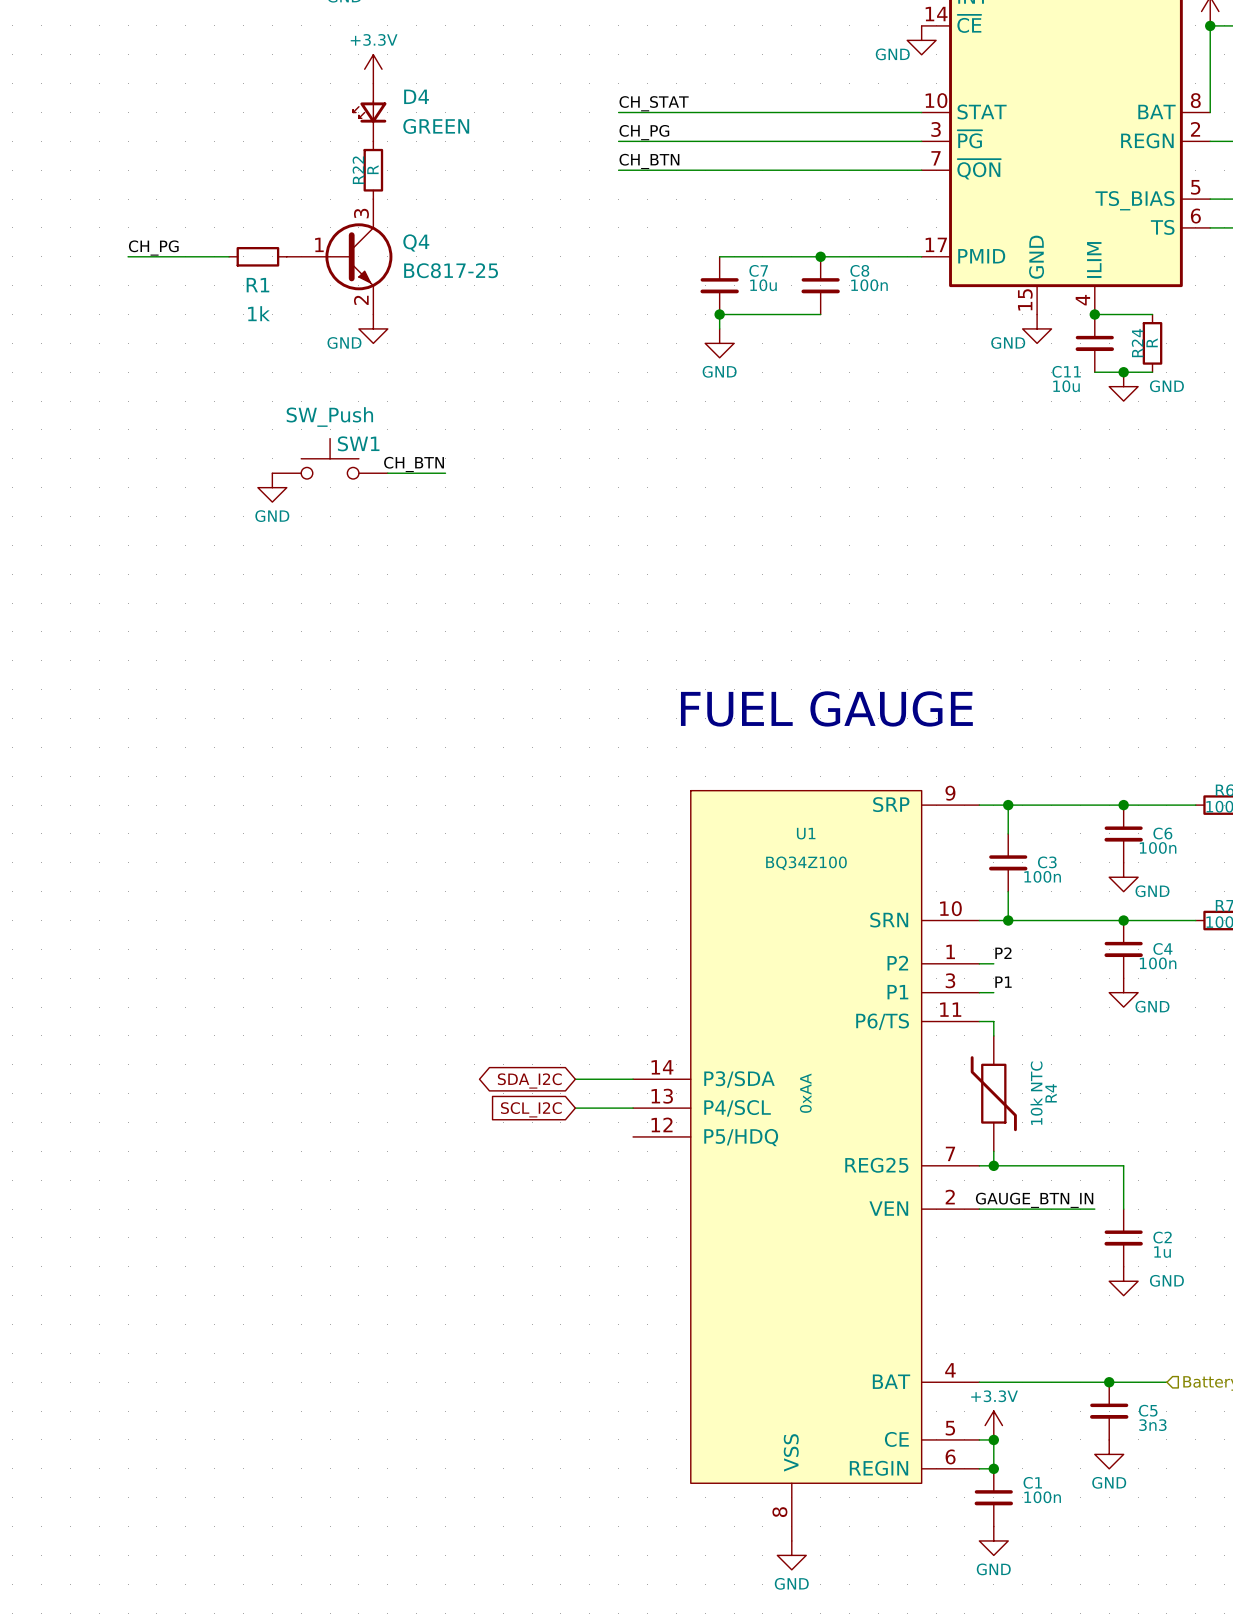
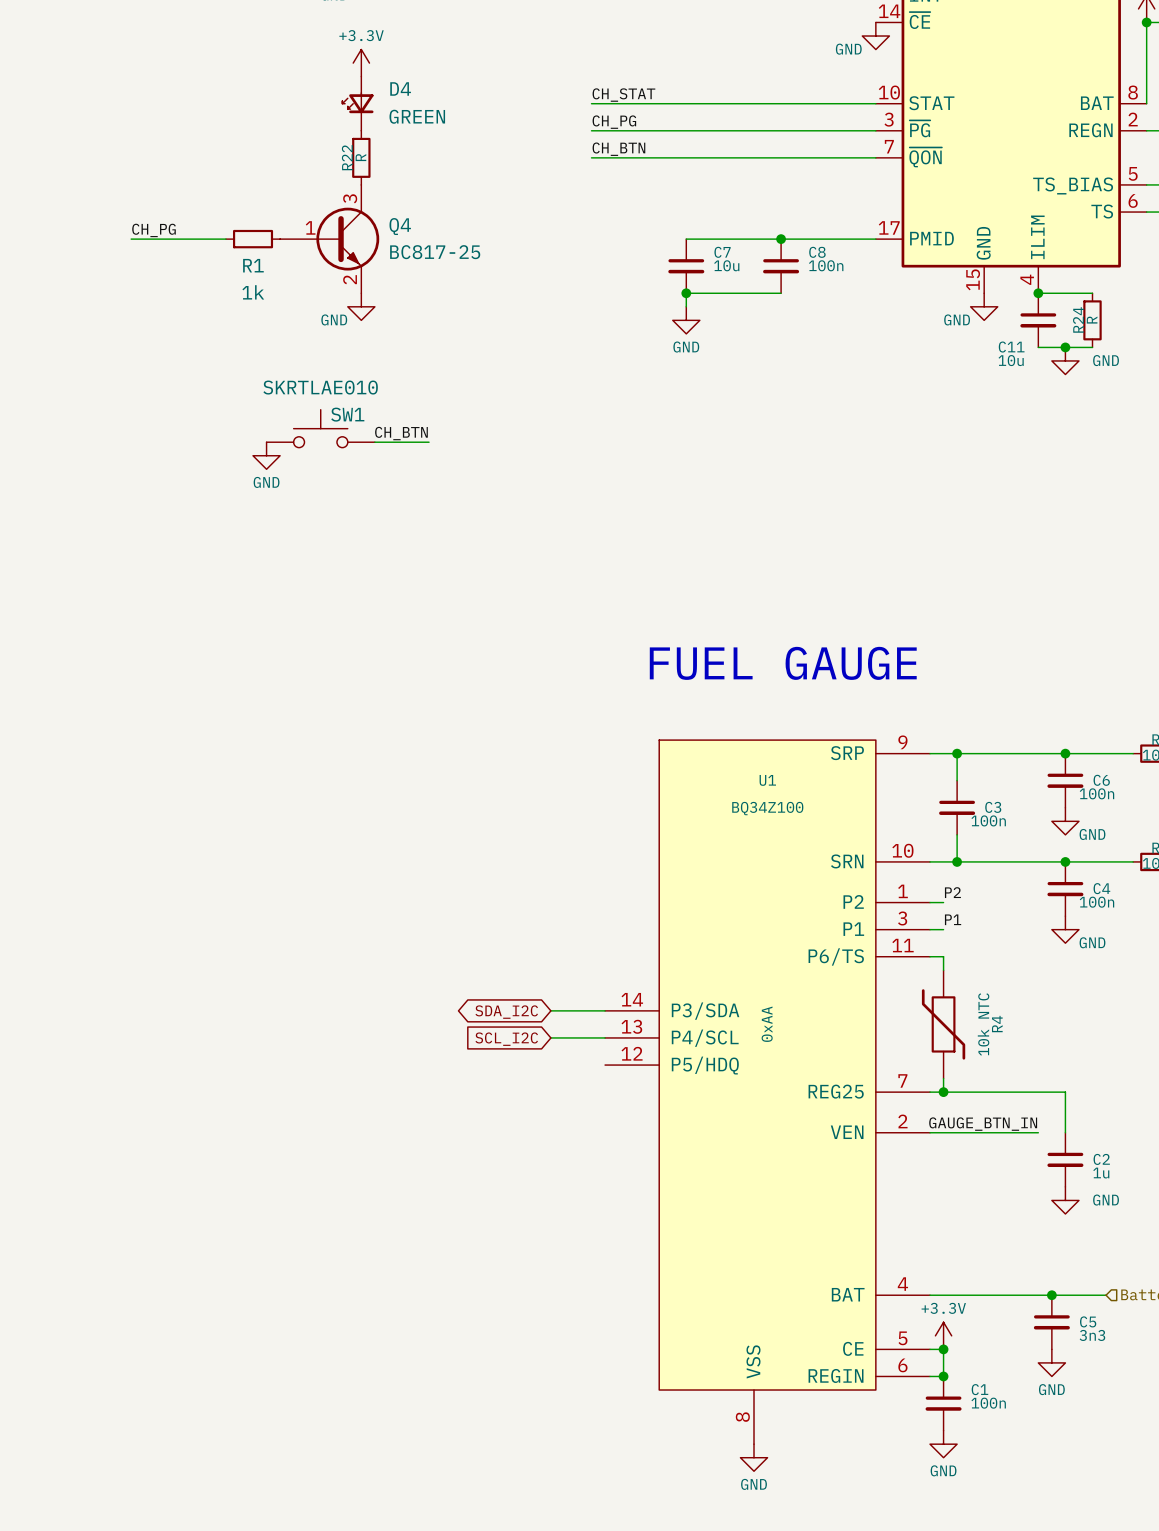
SW1 value: SW_Push (329, 417) -> SKRTLAE010 (320, 387)

